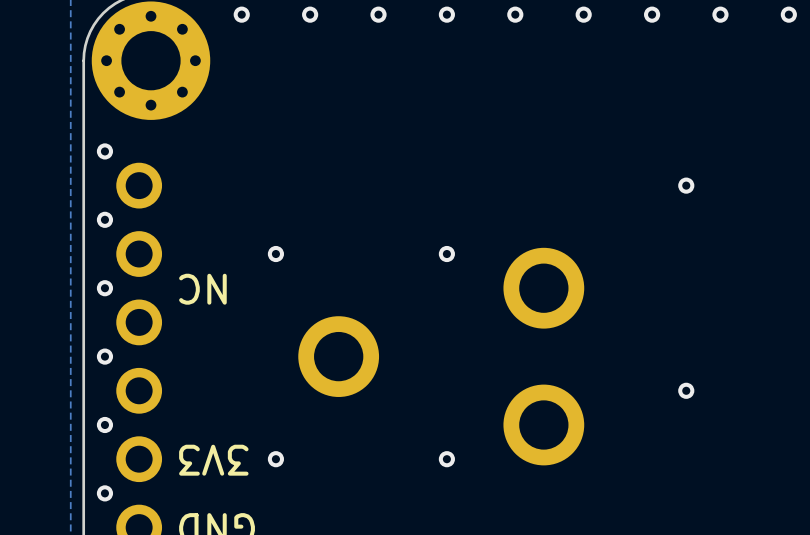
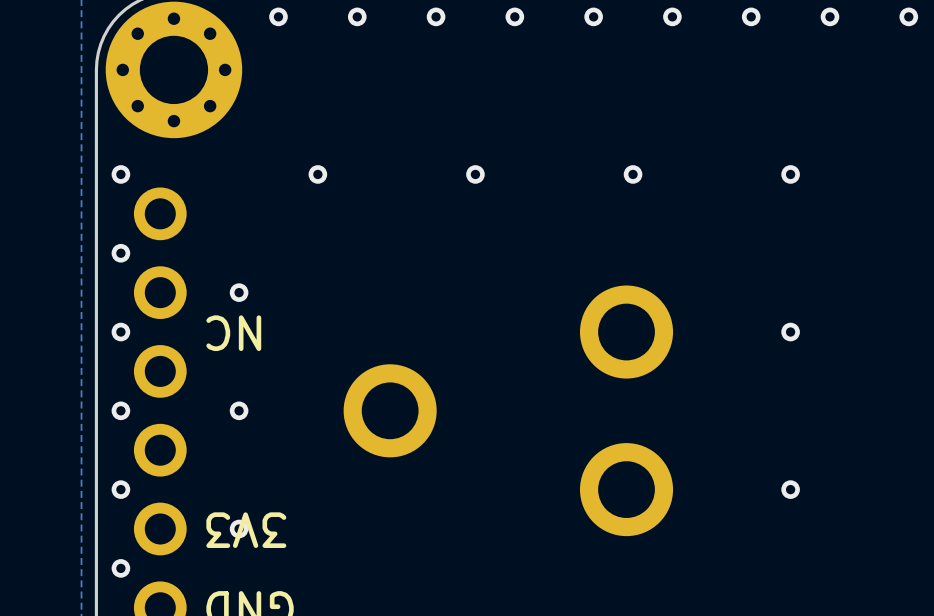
via: none -> (317, 174)
via: none -> (475, 174)
via: none -> (633, 174)
via position: (686, 185) -> (790, 174)
via: none -> (239, 292)
via: (275, 254) -> none
via: (446, 254) -> none
via: none -> (790, 332)
via: none -> (239, 410)
via position: (686, 390) -> (790, 489)
via: none -> (239, 528)
via: (275, 459) -> none
via: (446, 459) -> none

